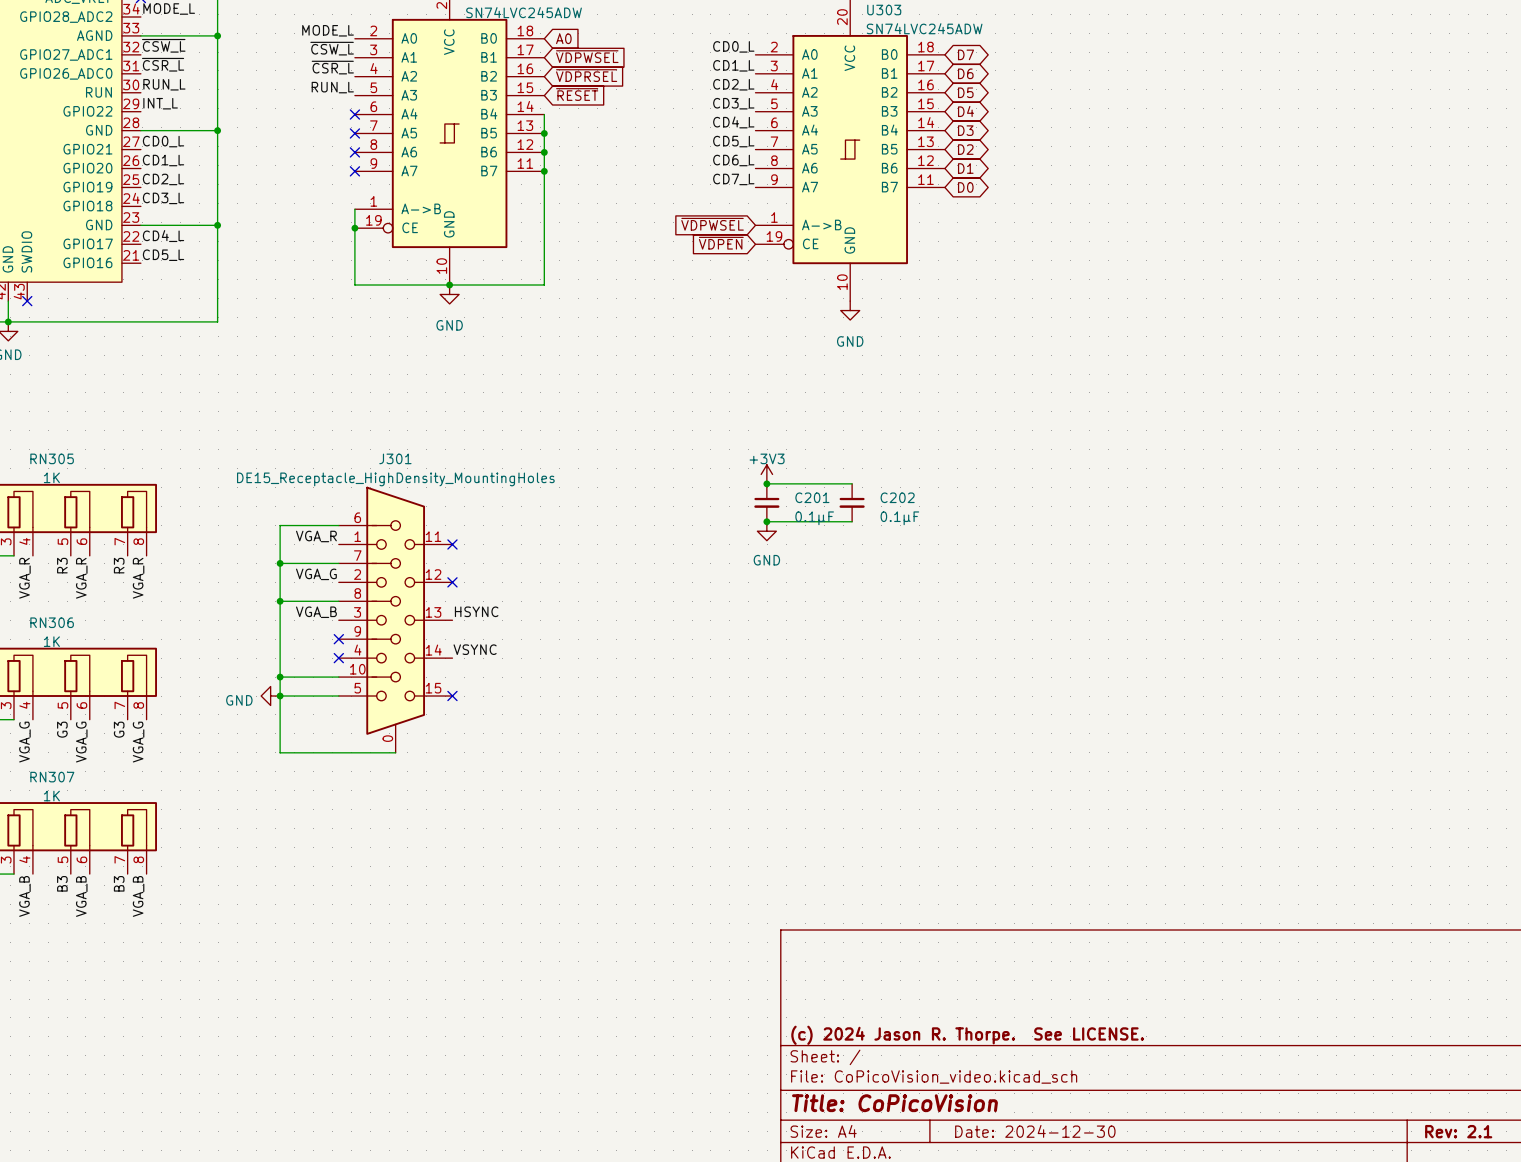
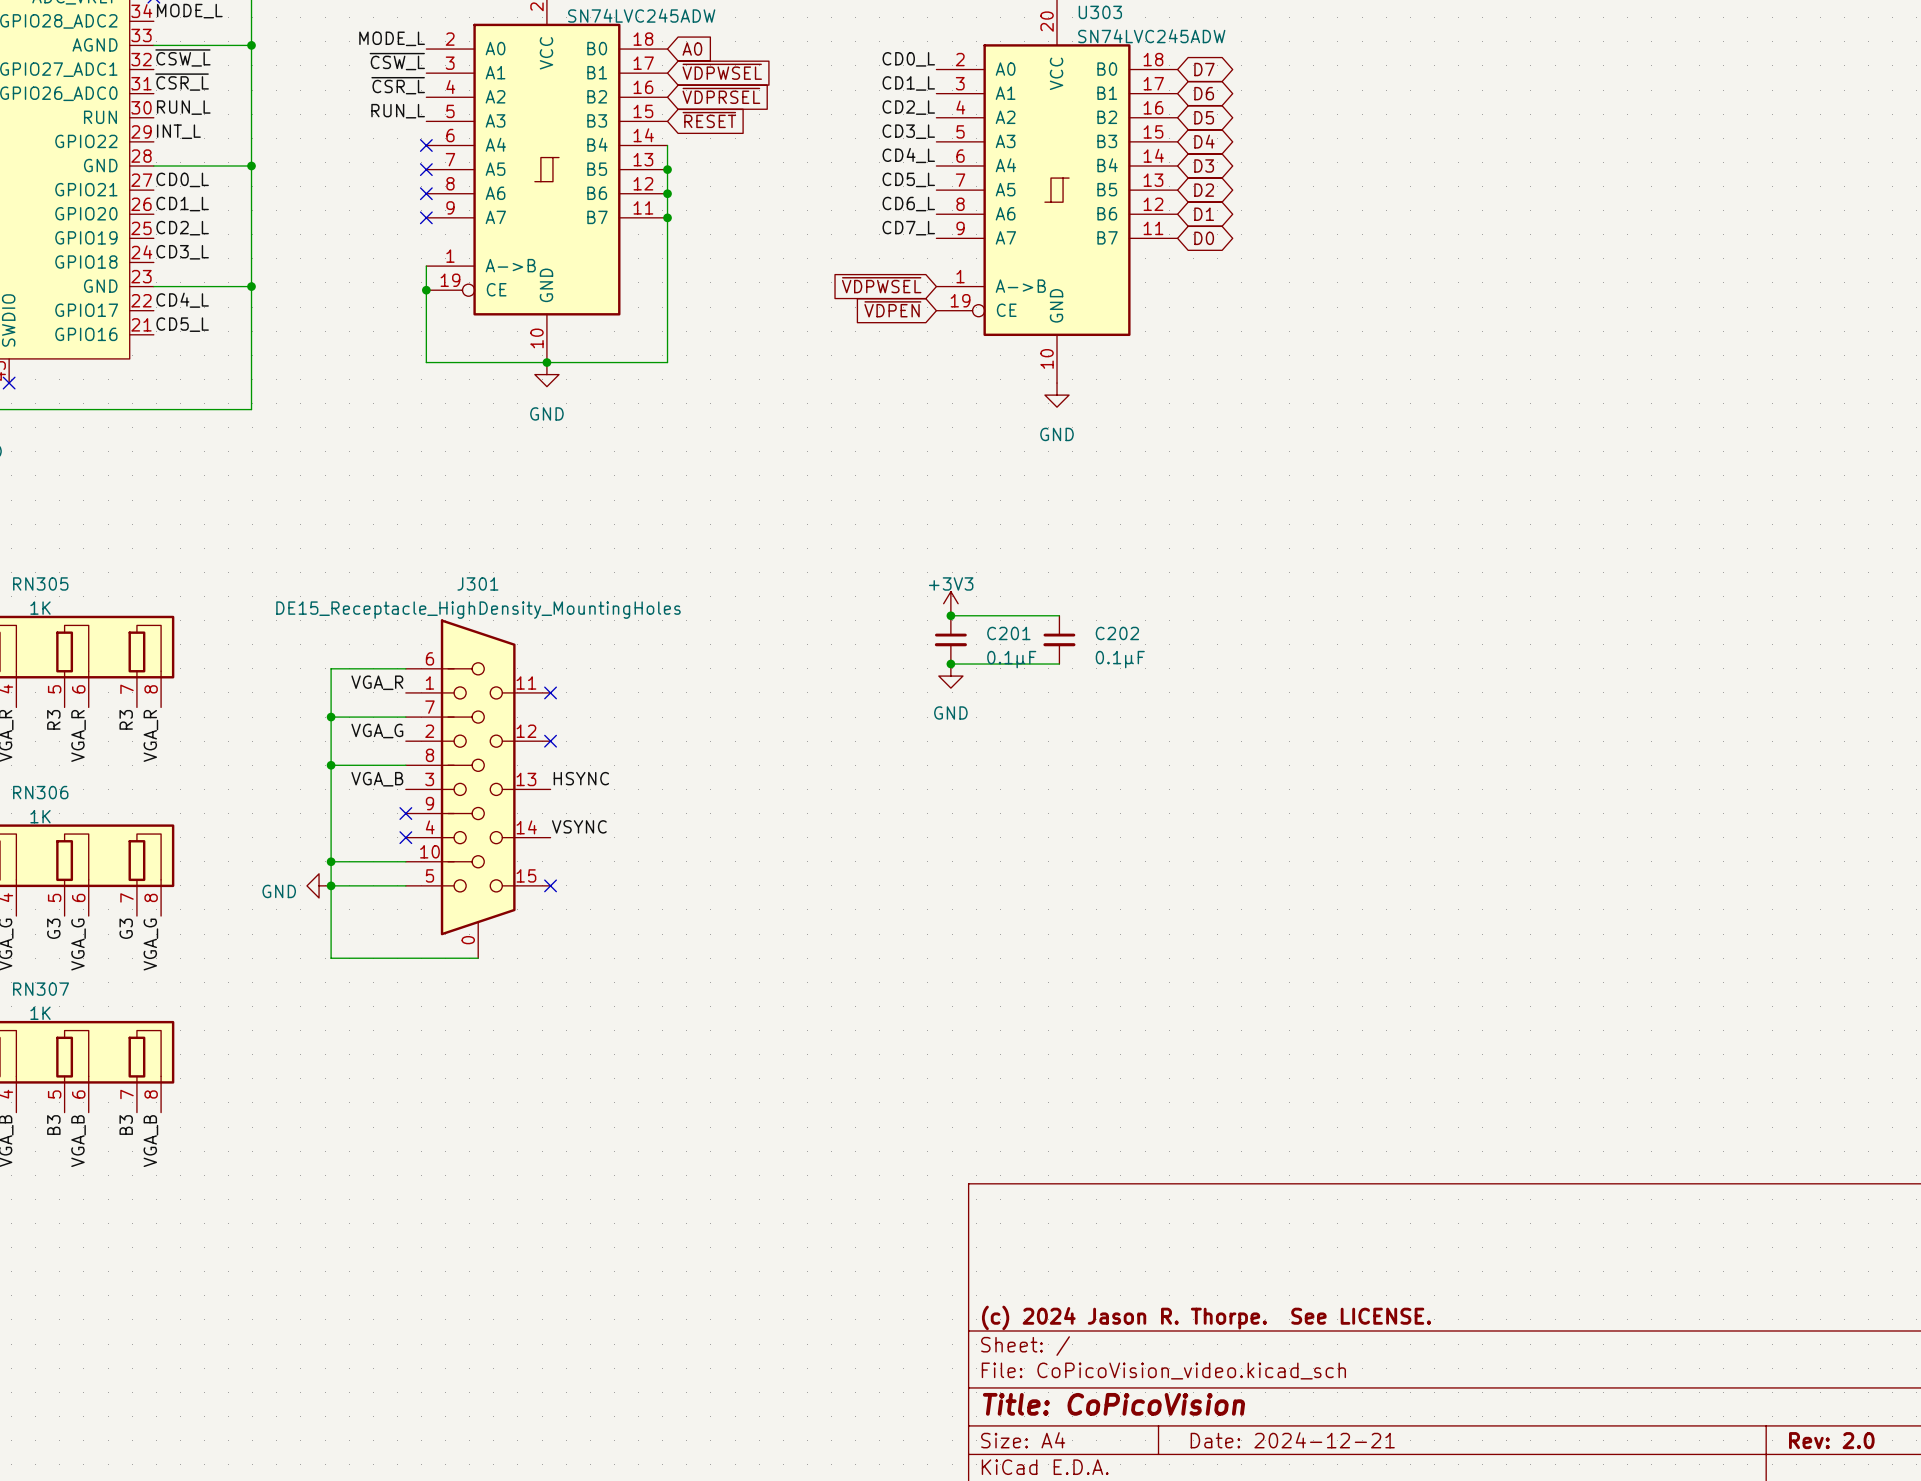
title block: Date: 2024-12-30 (1035, 1131) -> Date: 2024-12-21 (1292, 1440)
title block: Rev: 2.1 (1458, 1131) -> Rev: 2.0 (1831, 1440)

